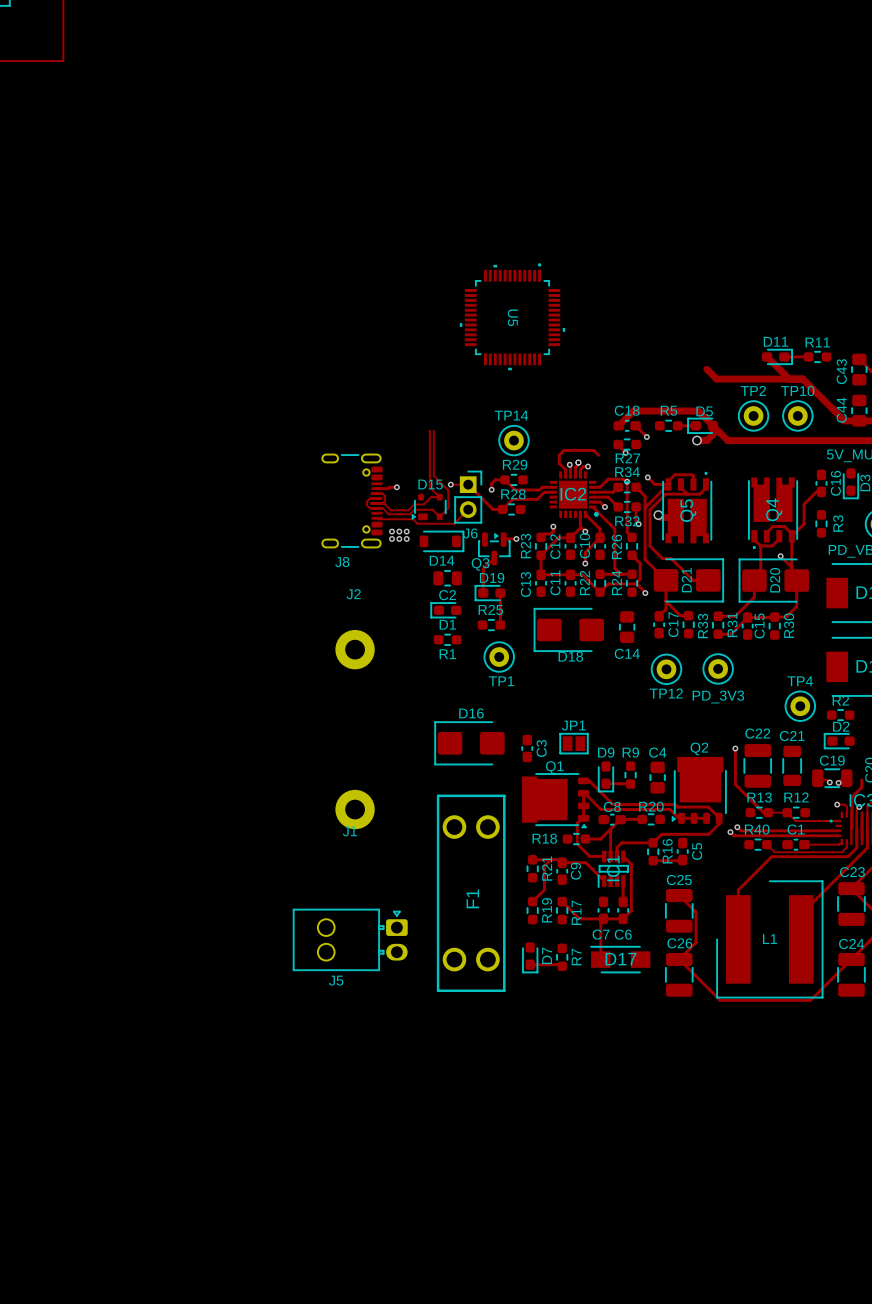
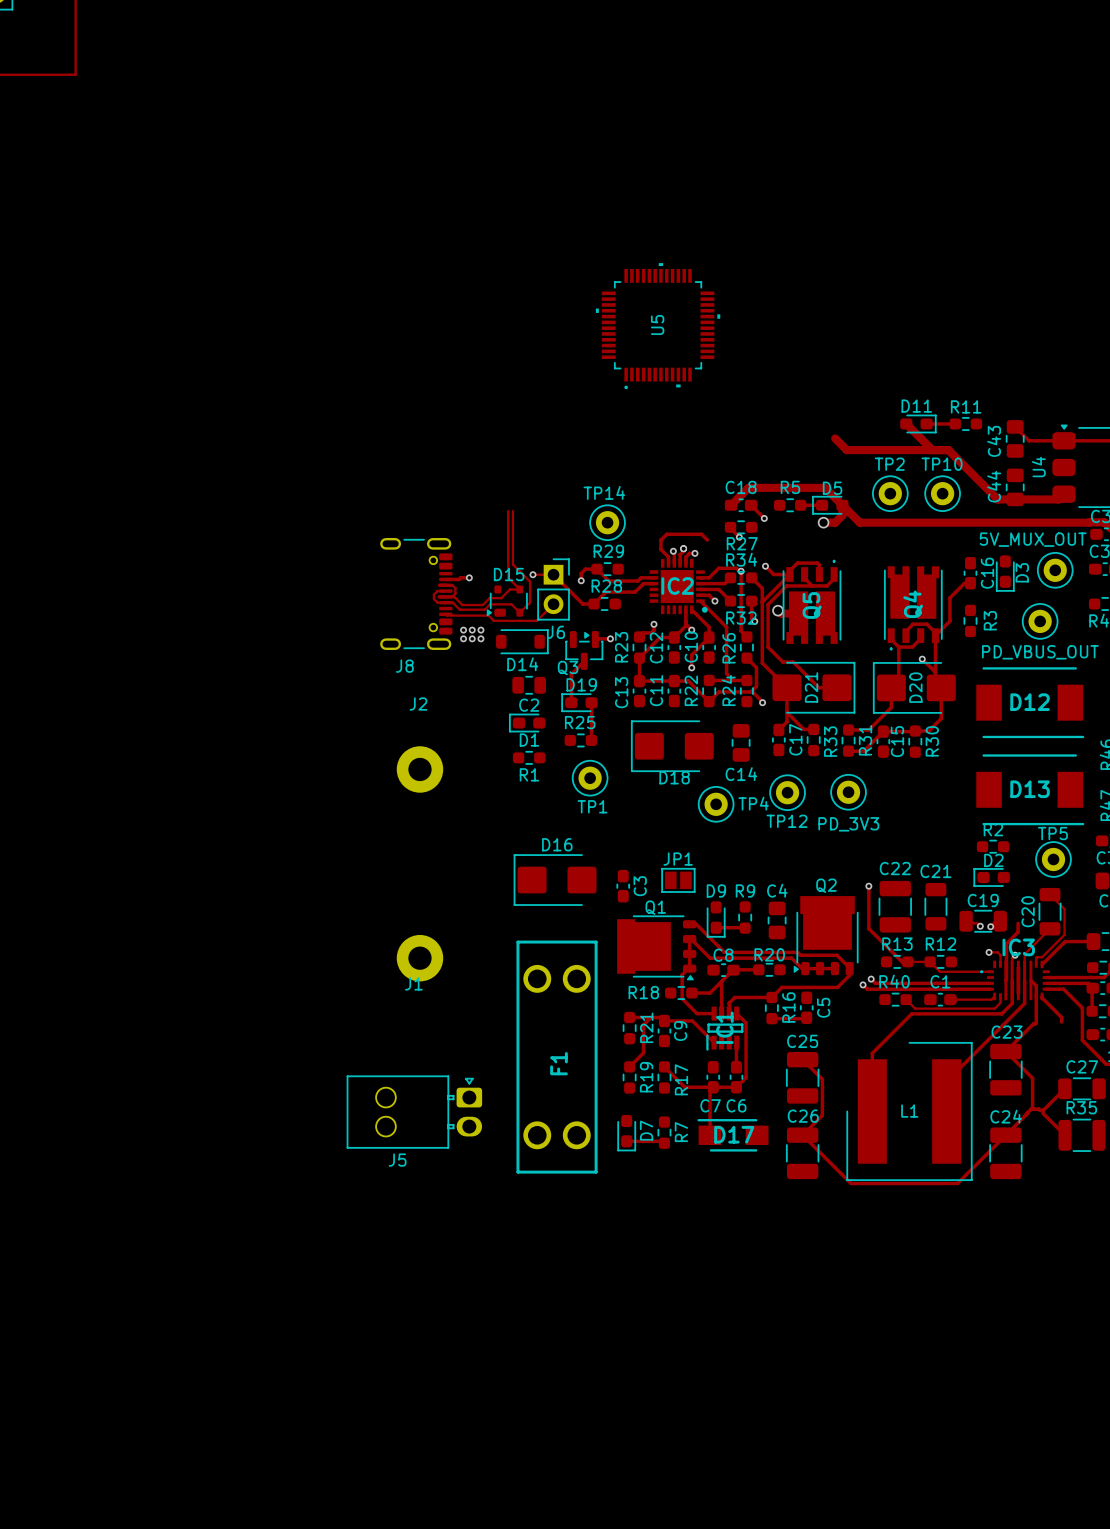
U5 rotation: 0° (512, 316) -> 180° (658, 326)
TP4 name position: TP4 (800, 681) -> TP4 (753, 803)
TP4 position: (800, 706) -> (716, 804)

